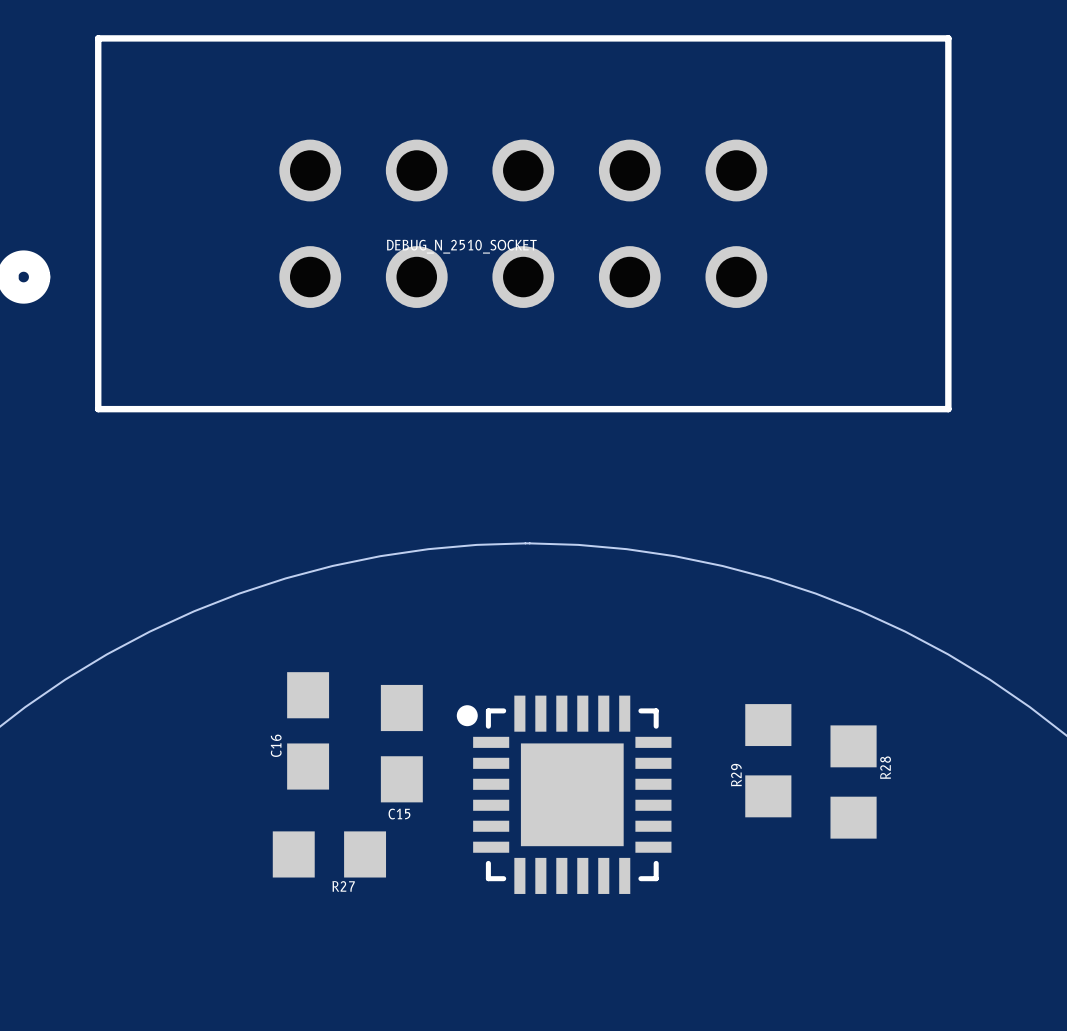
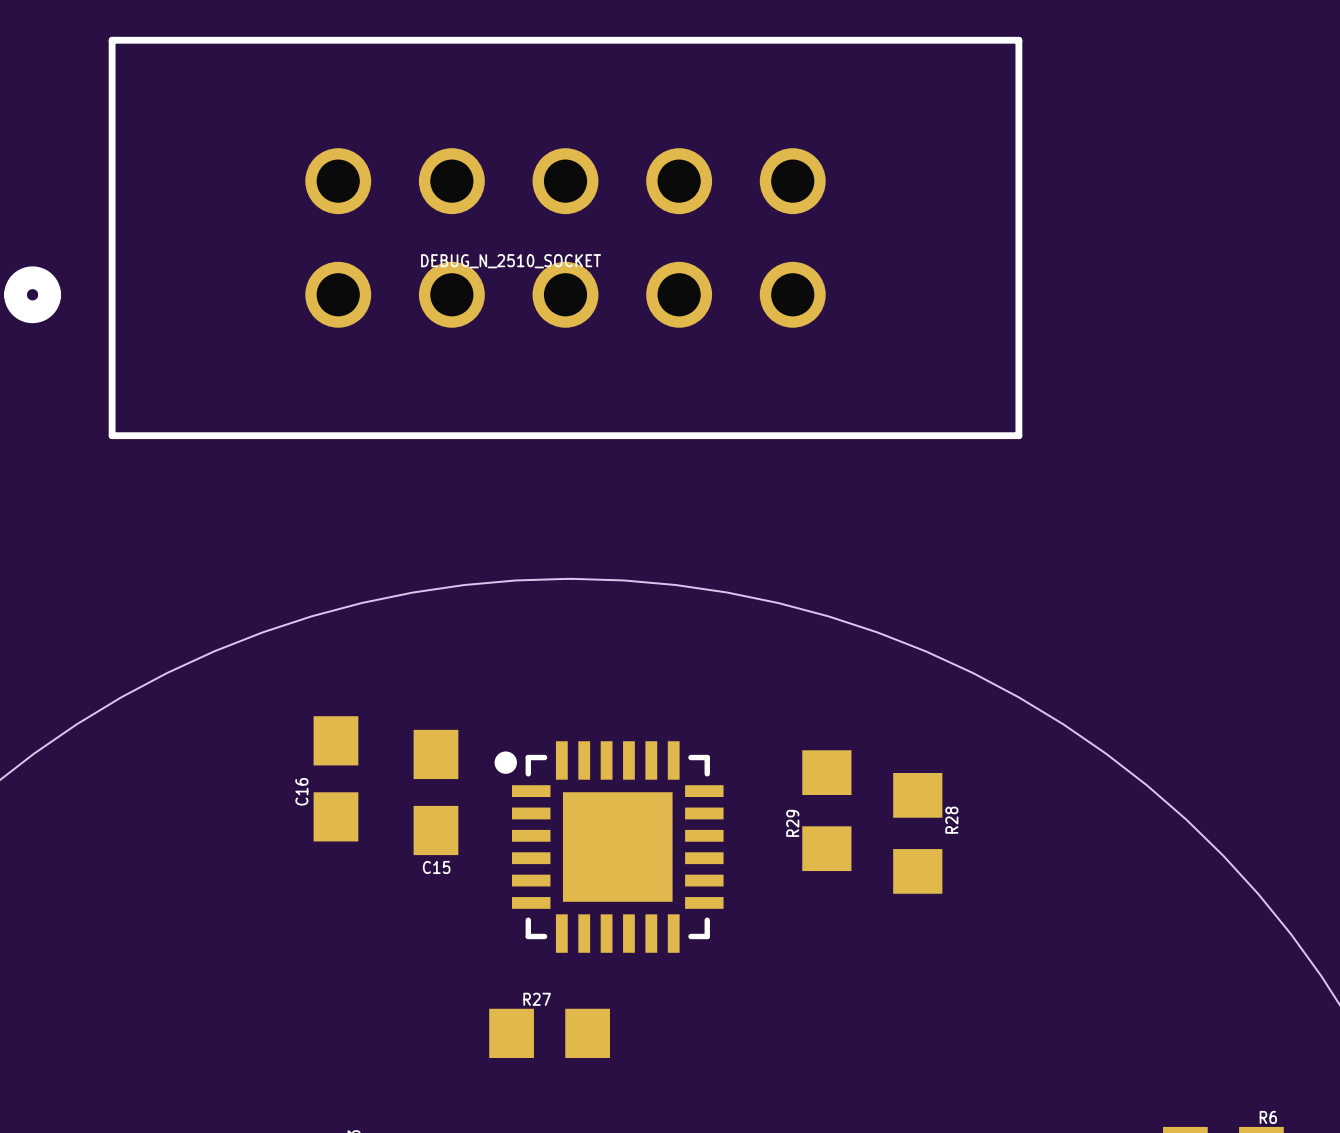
R27 position: (329, 854) -> (549, 1033)
R27 name position: R27 (343, 886) -> R27 (537, 999)

